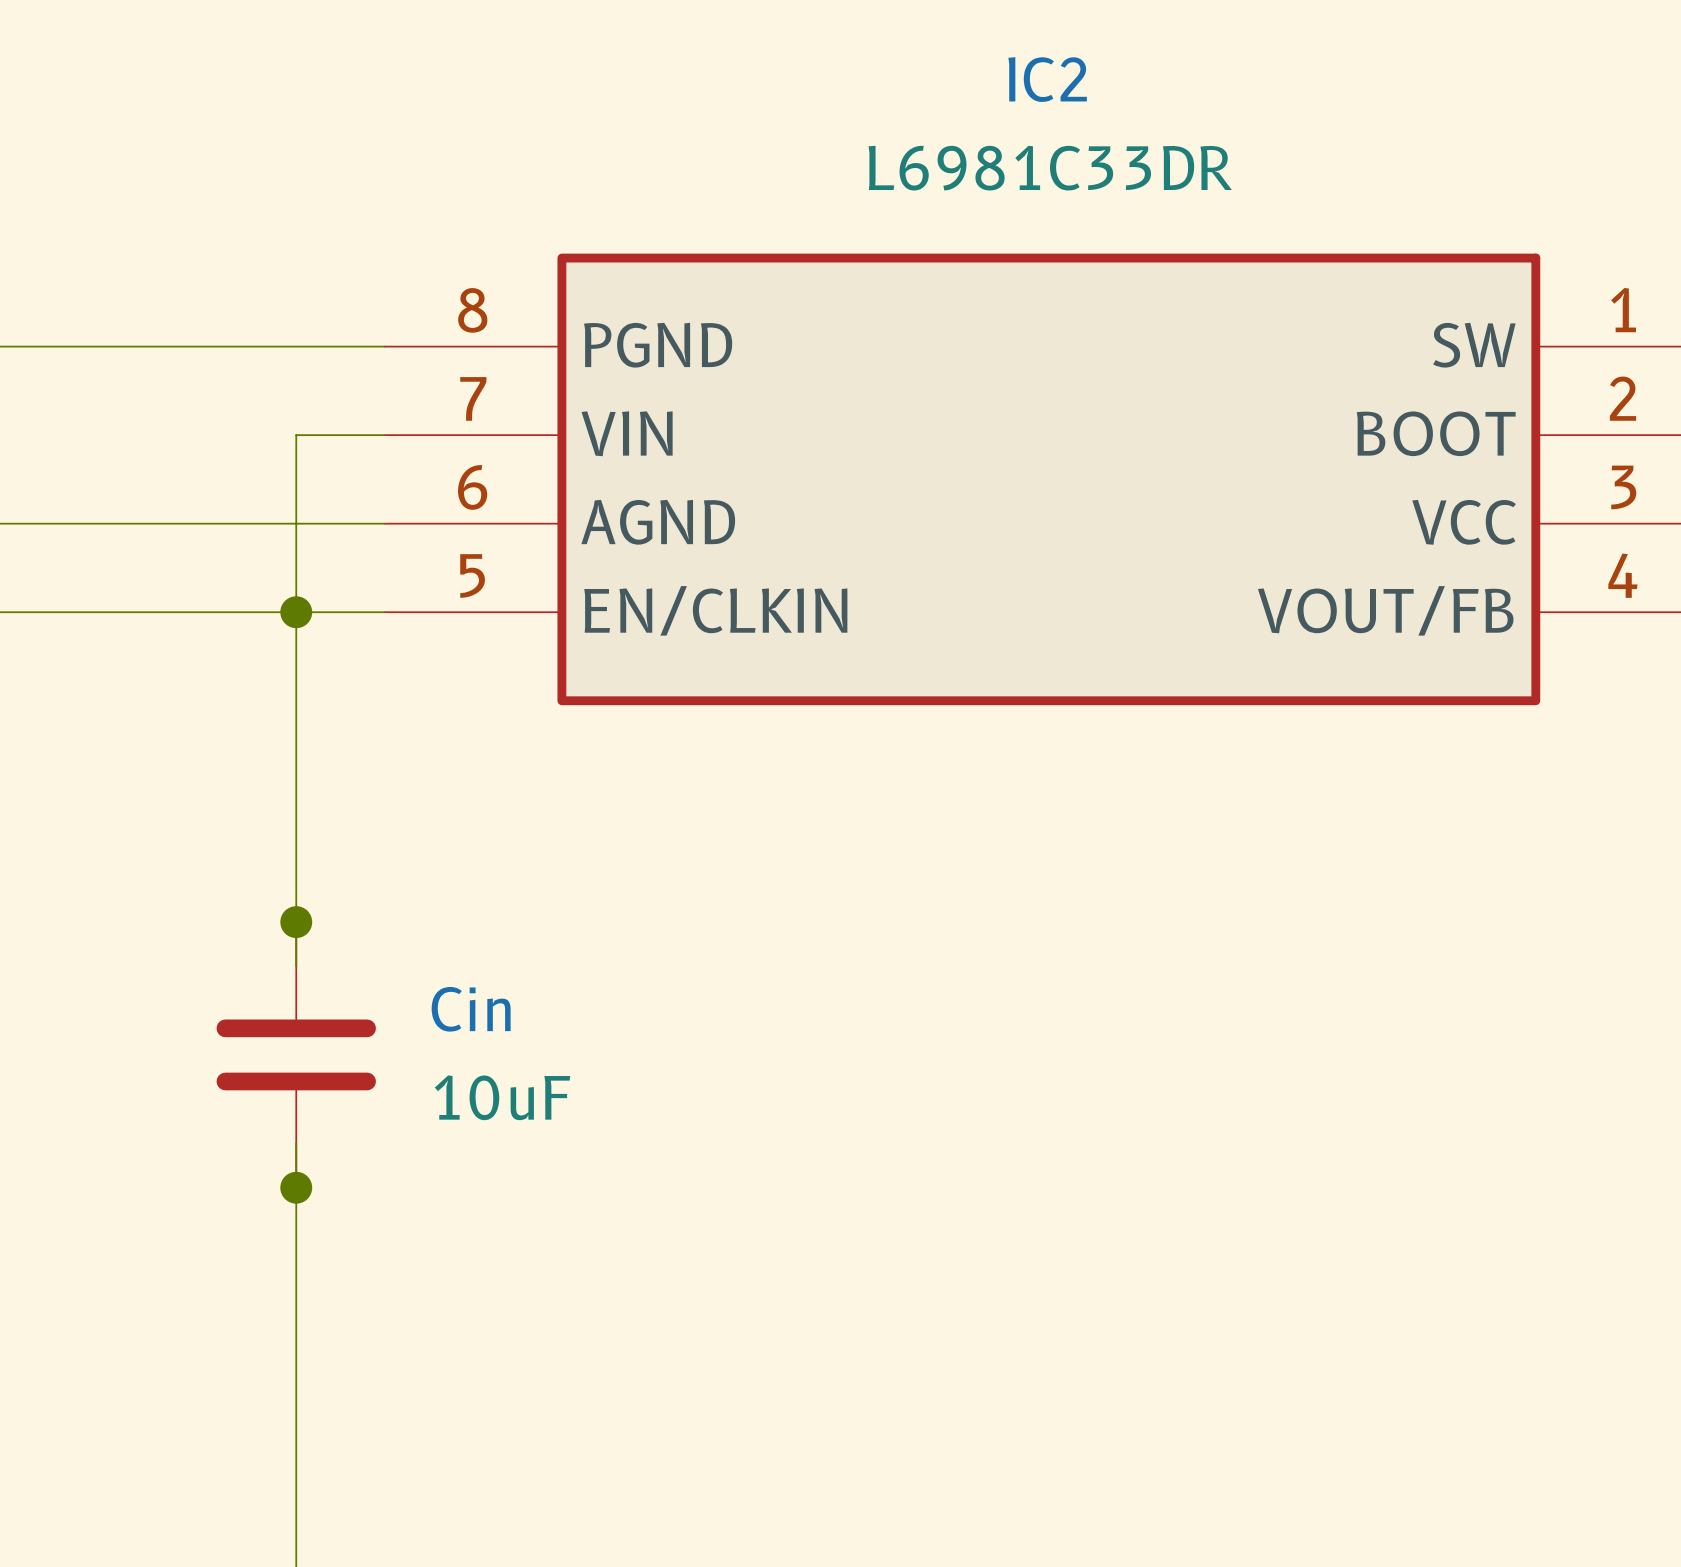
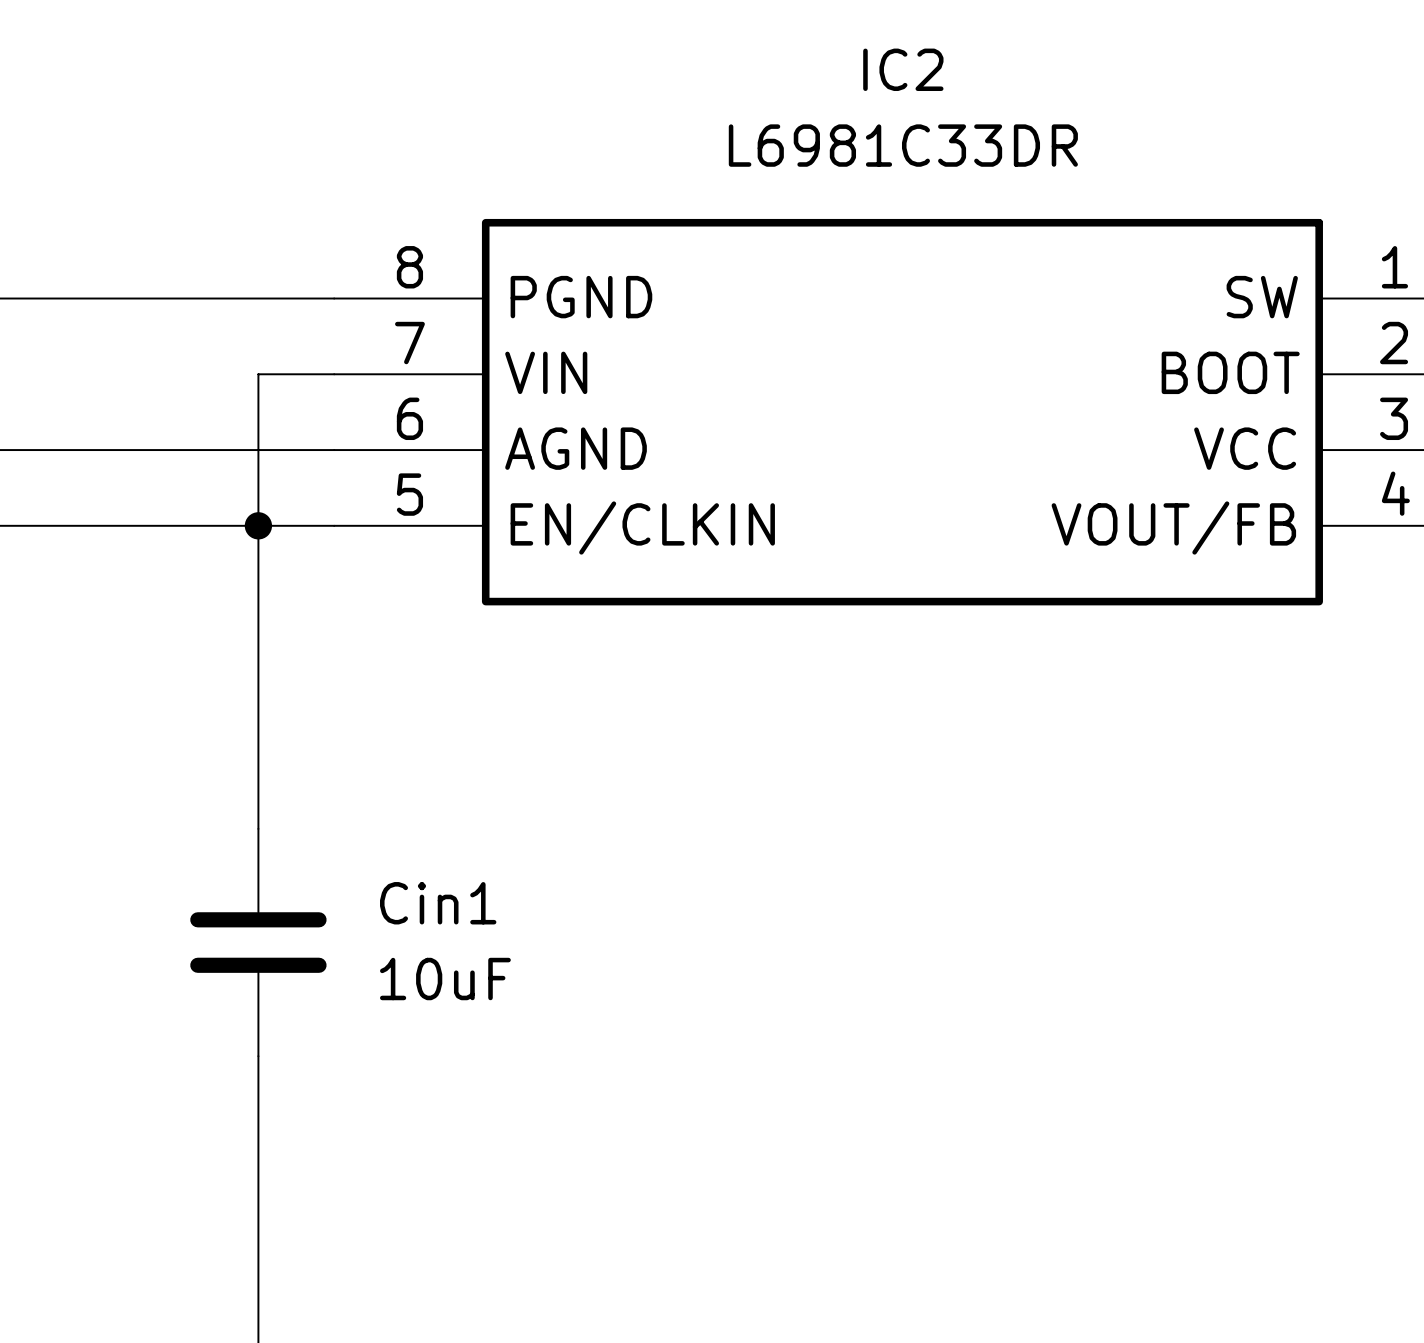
junction: (296, 922) -> none
Cin: 10uF (296, 1054) -> none
Cin1: none -> 10uF (258, 942)
junction: (296, 1187) -> none

